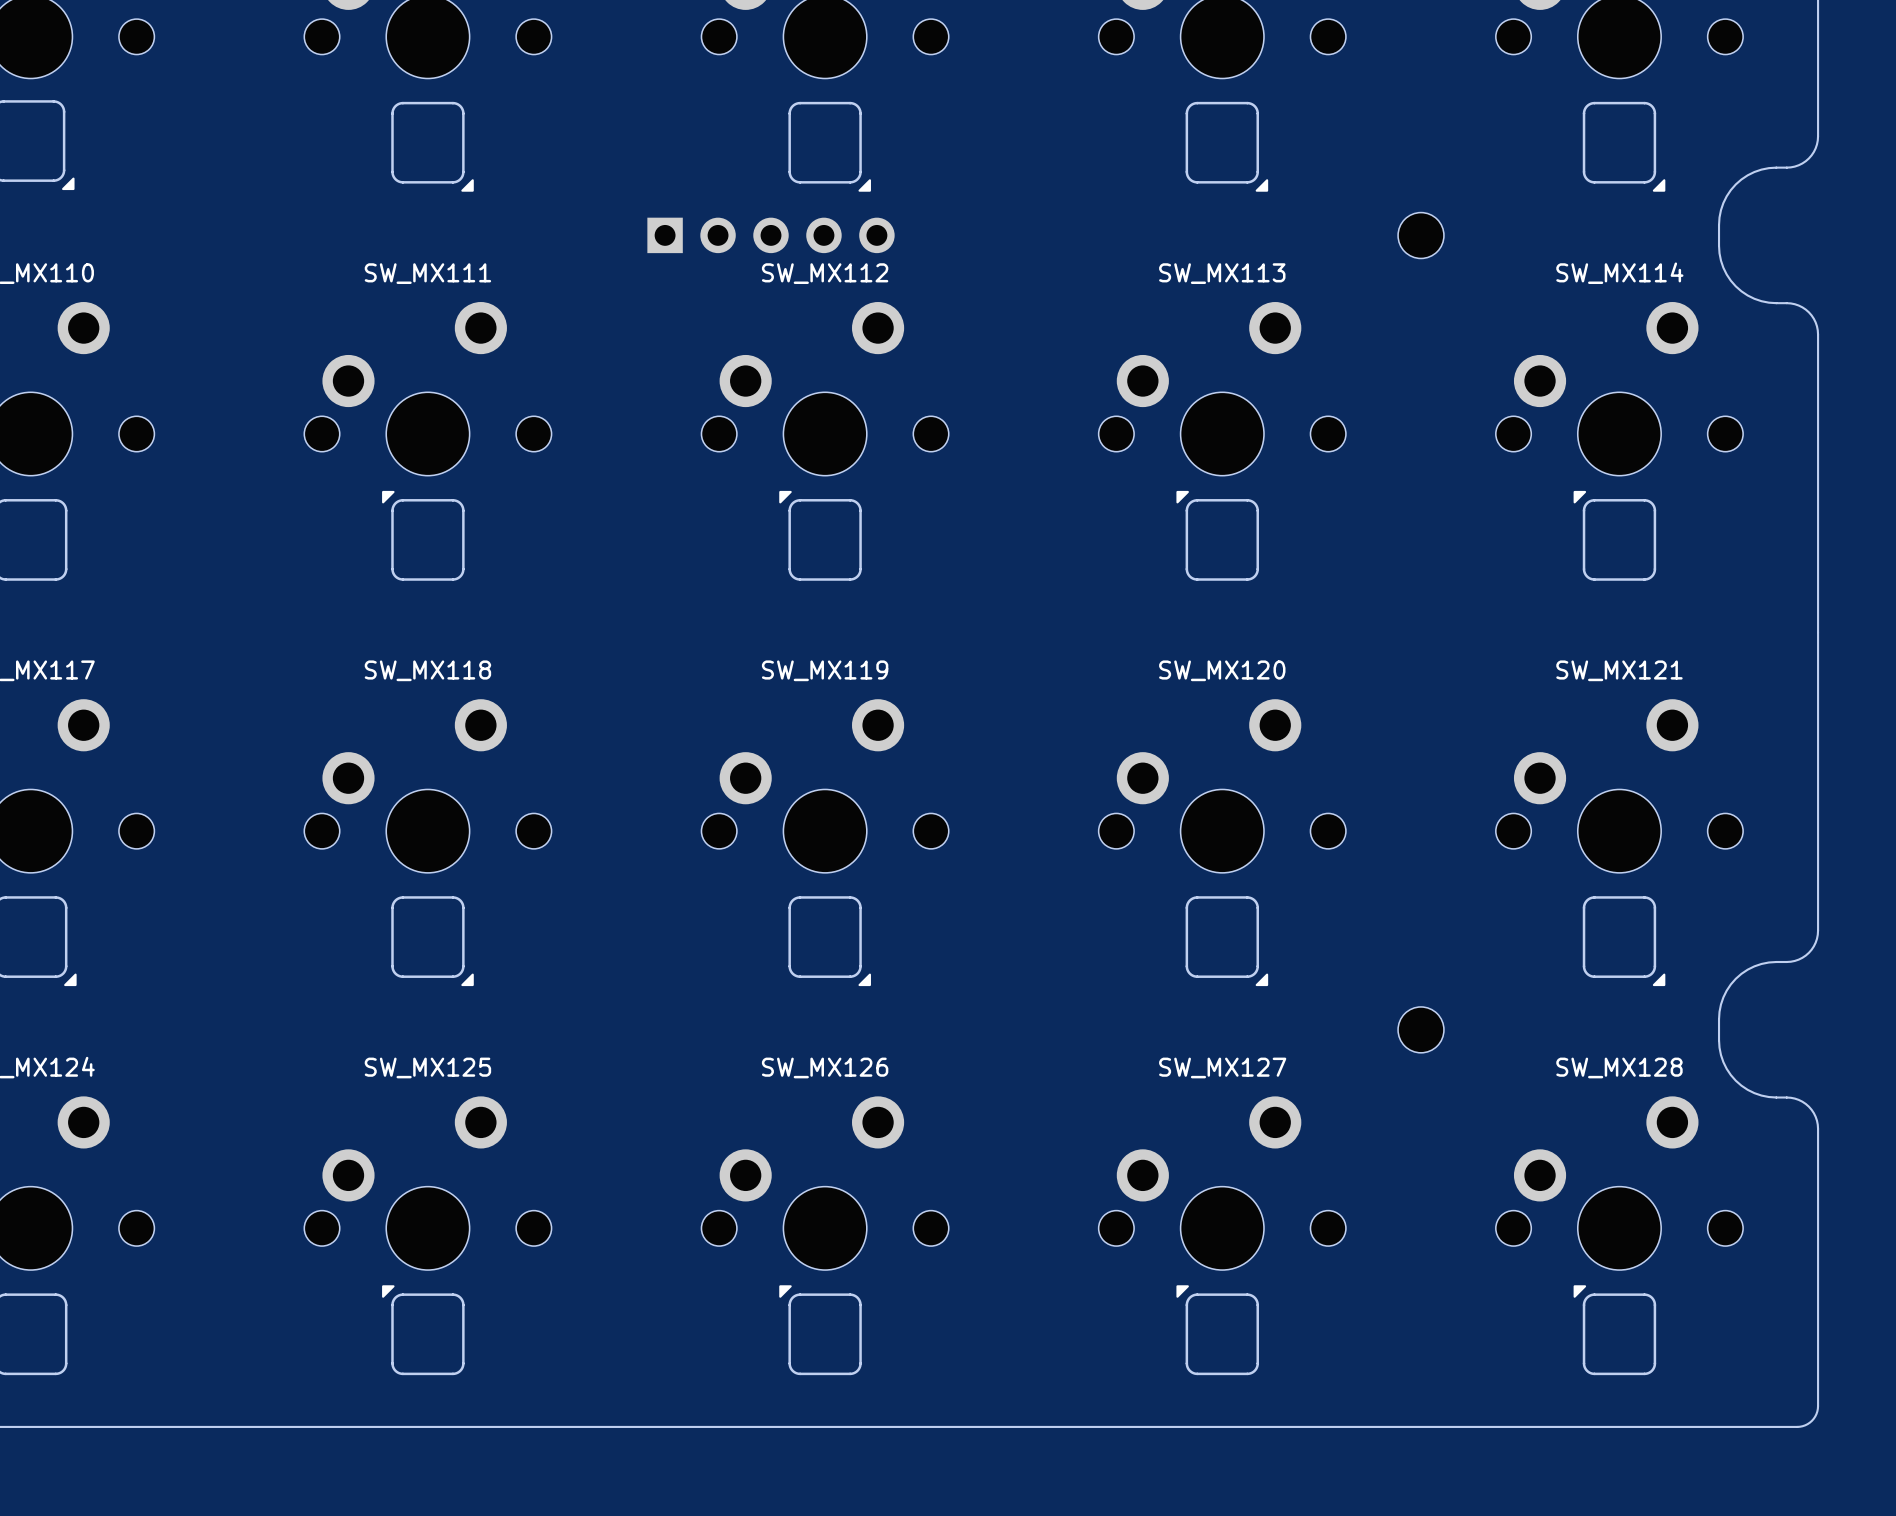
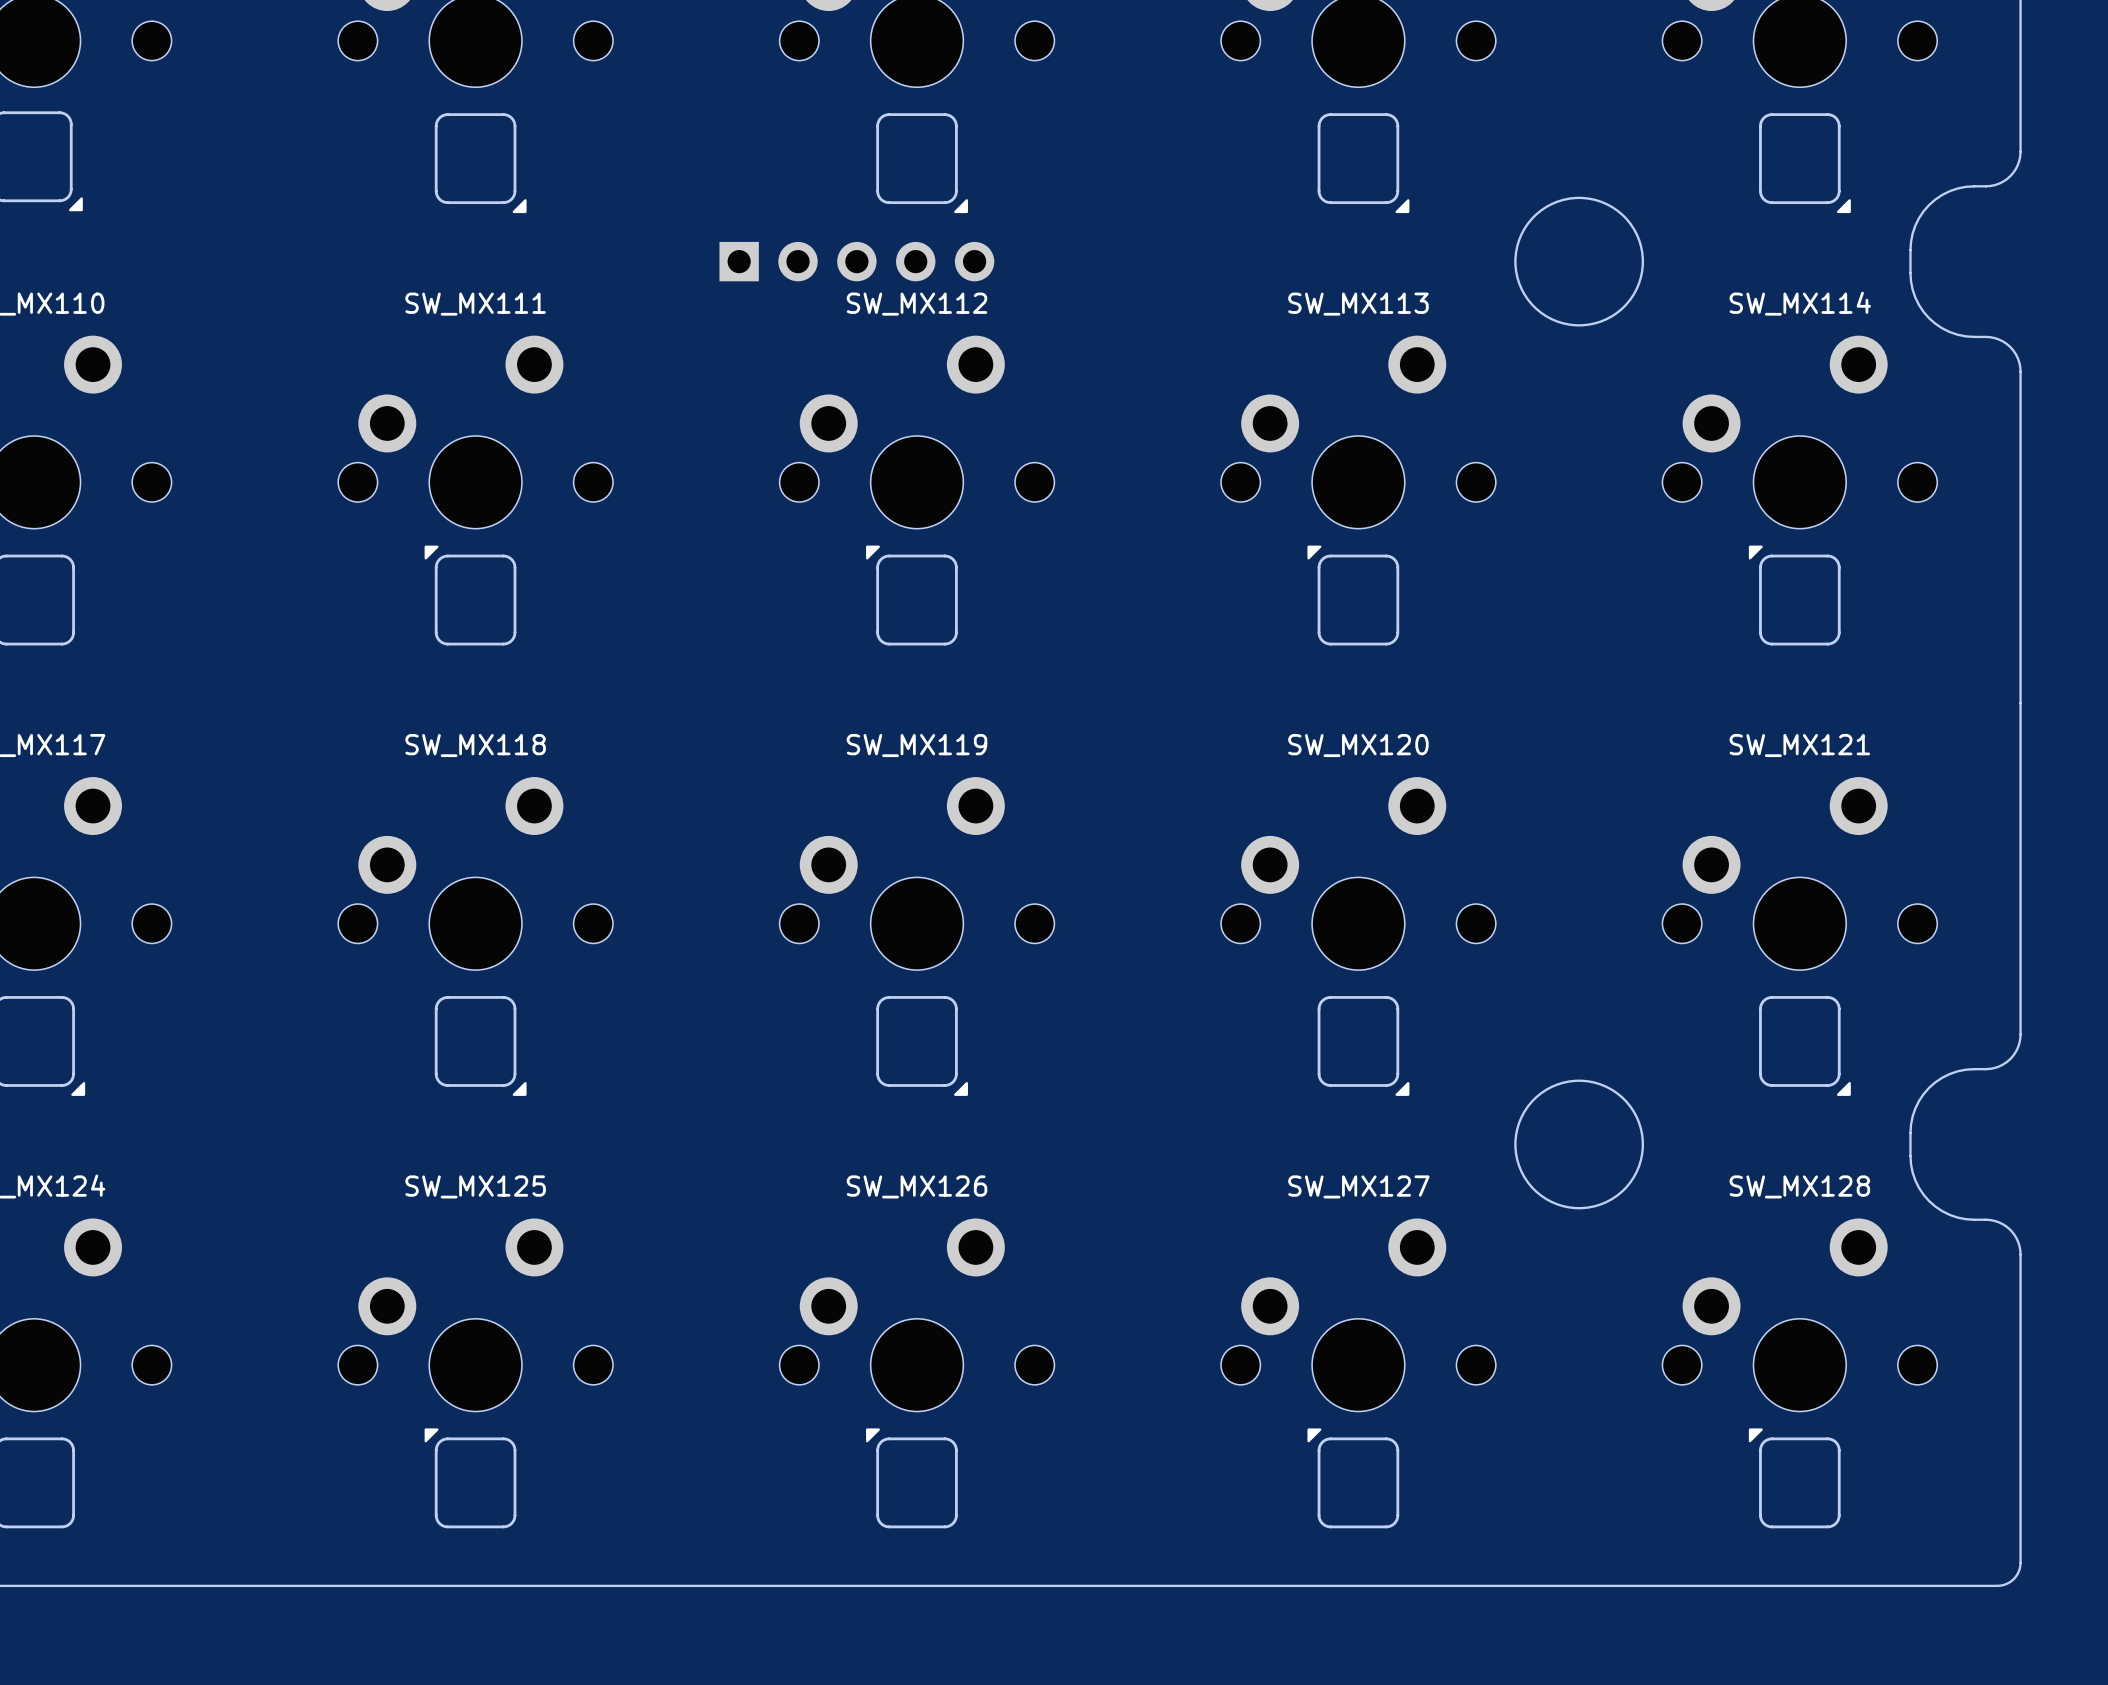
round board edge: none -> [1514, 196, 1645, 327]
part: (1421, 235) -> none
round board edge: none -> [1514, 1079, 1645, 1210]
part: (1421, 1029) -> none

